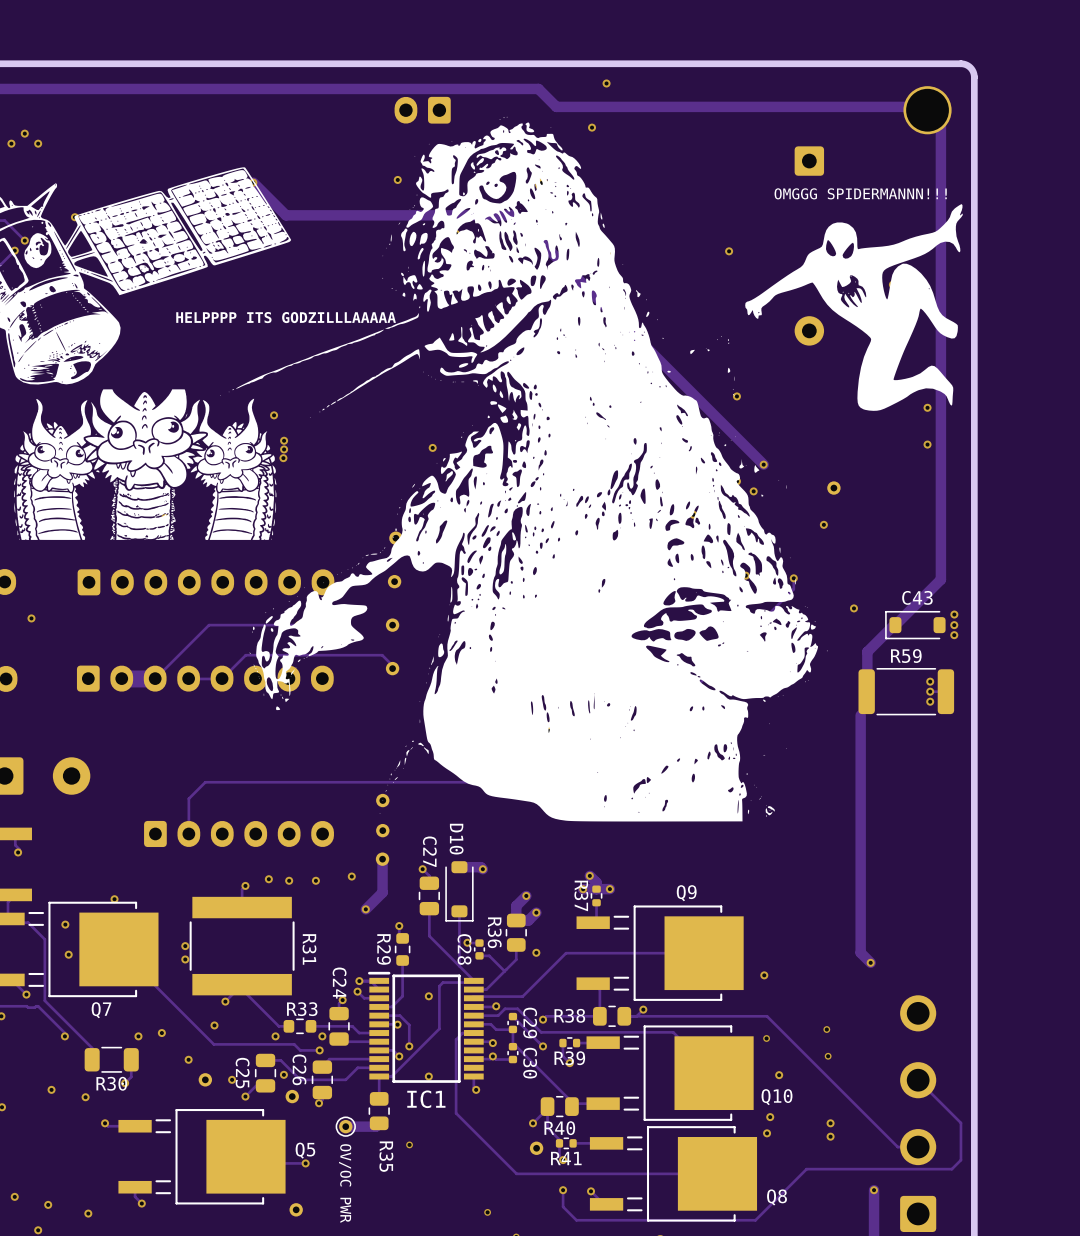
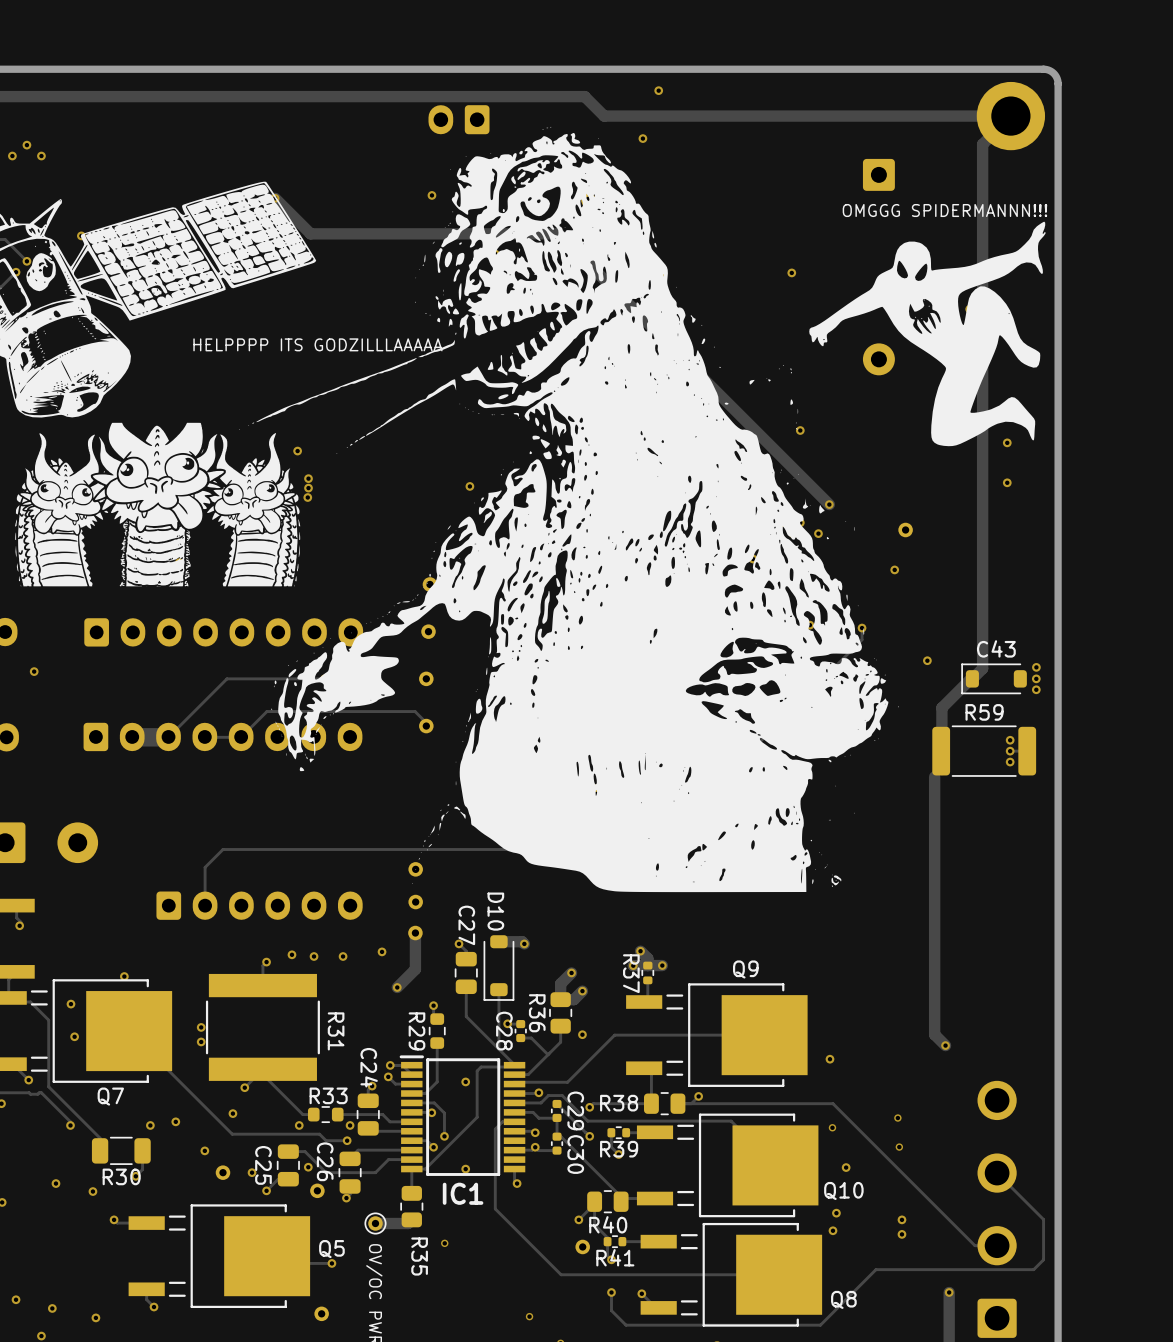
part footprint: [903, 86, 952, 135] -> [976, 81, 1046, 151]
track: (920, 106) (940, 126) (940, 579) (904, 615) -> (1000, 116) (1010, 116) (982, 144) (982, 668)

